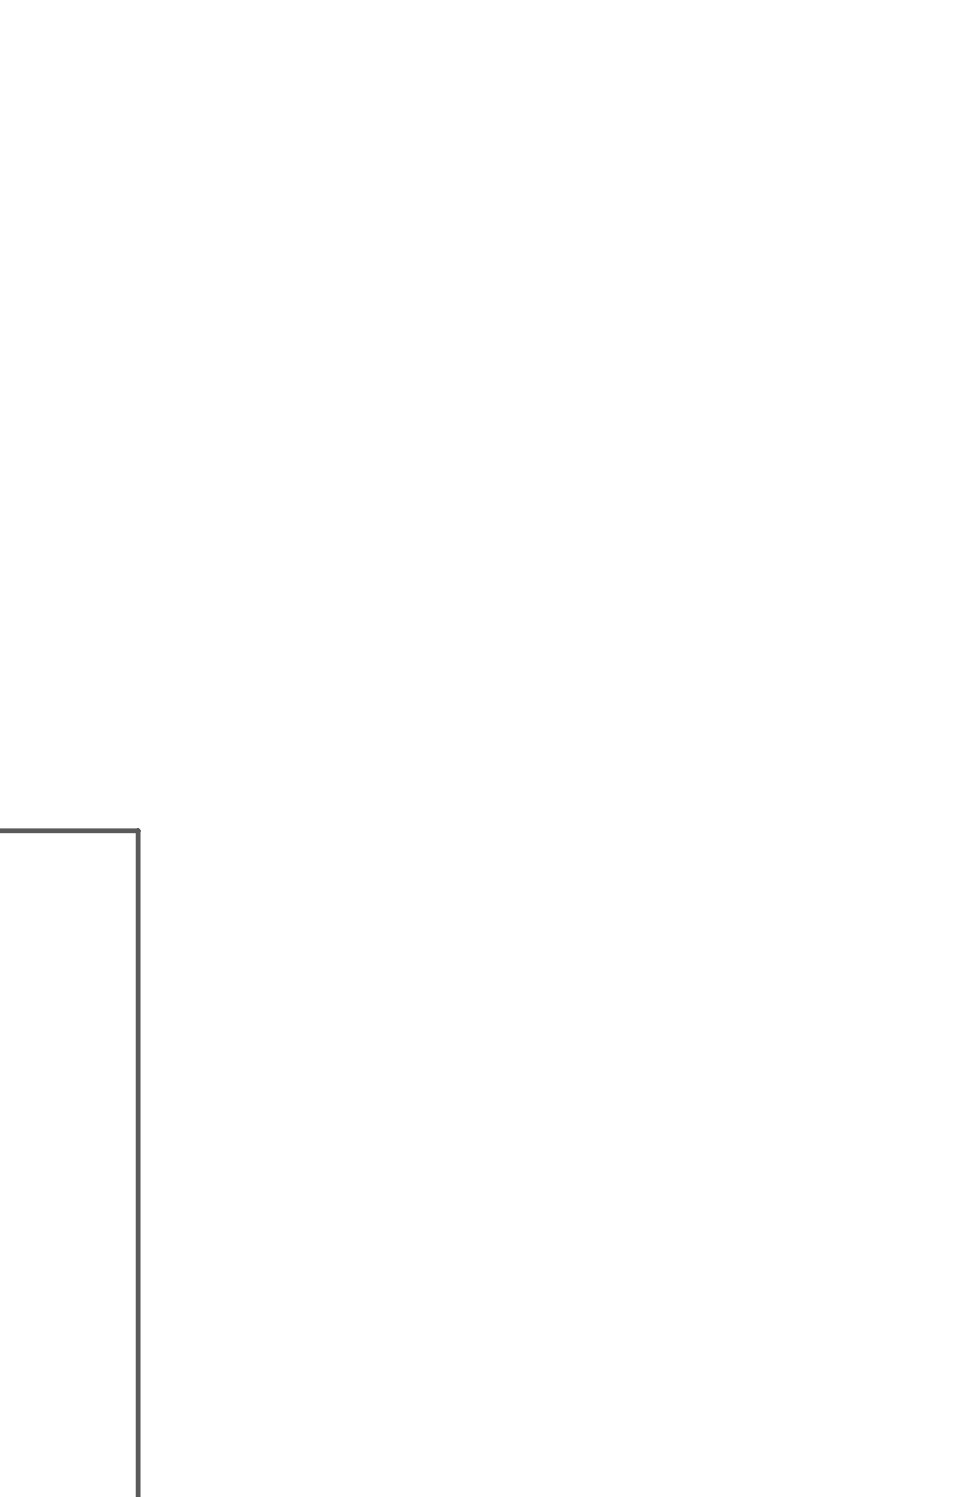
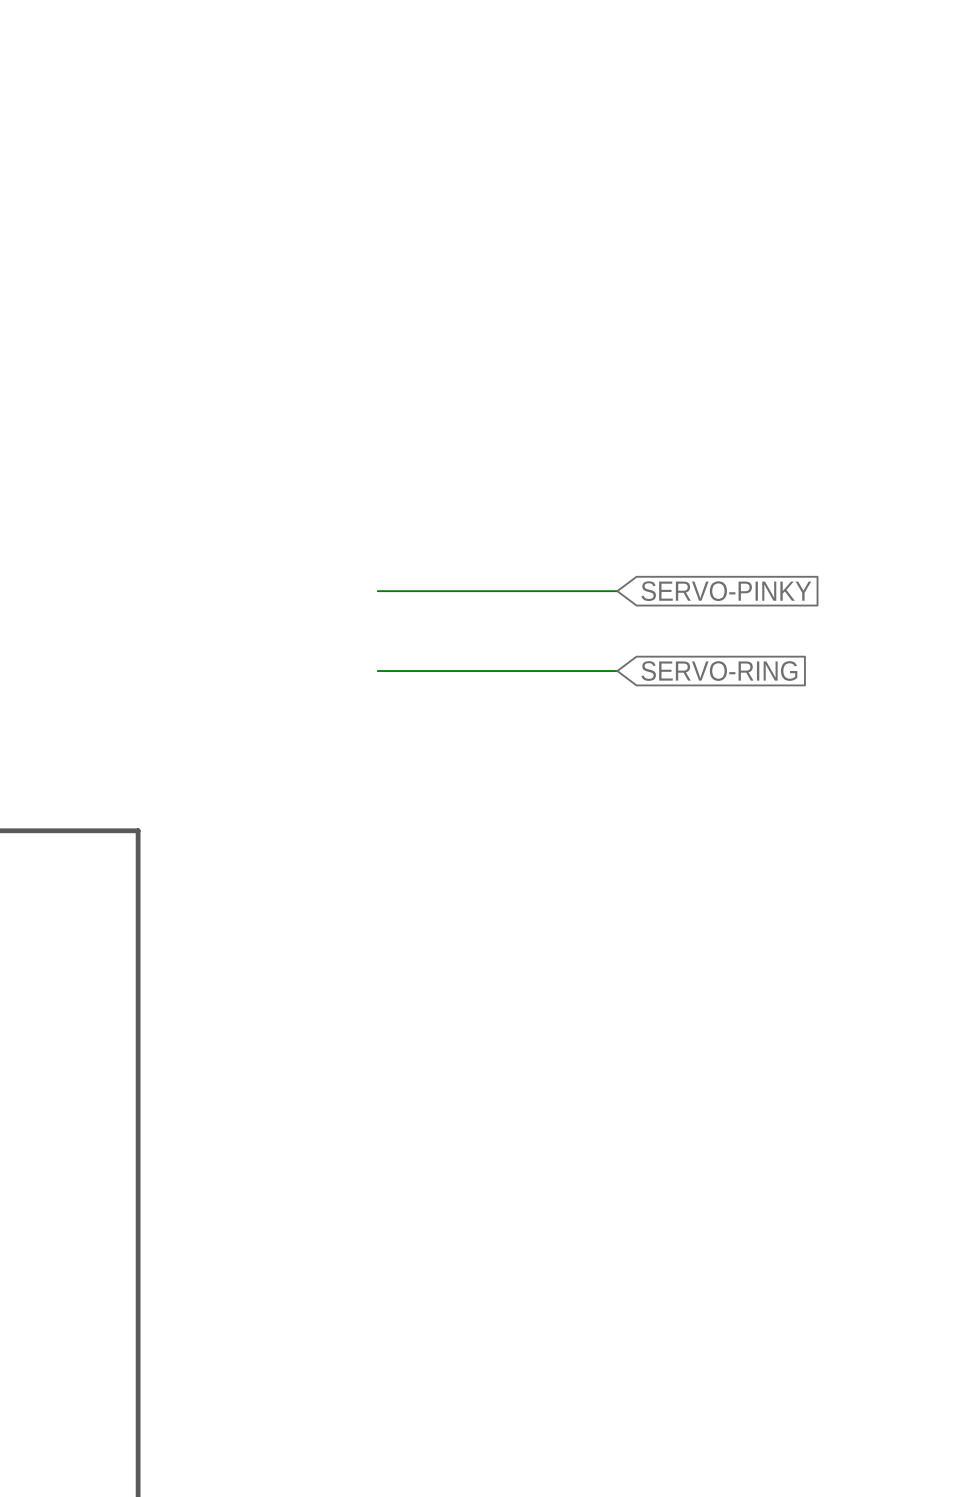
wire: none -> (377, 591) (617, 591)
global label: none -> SERVO-PINKY (726, 591)
wire: none -> (377, 671) (617, 671)
global label: none -> SERVO-RING (719, 671)

